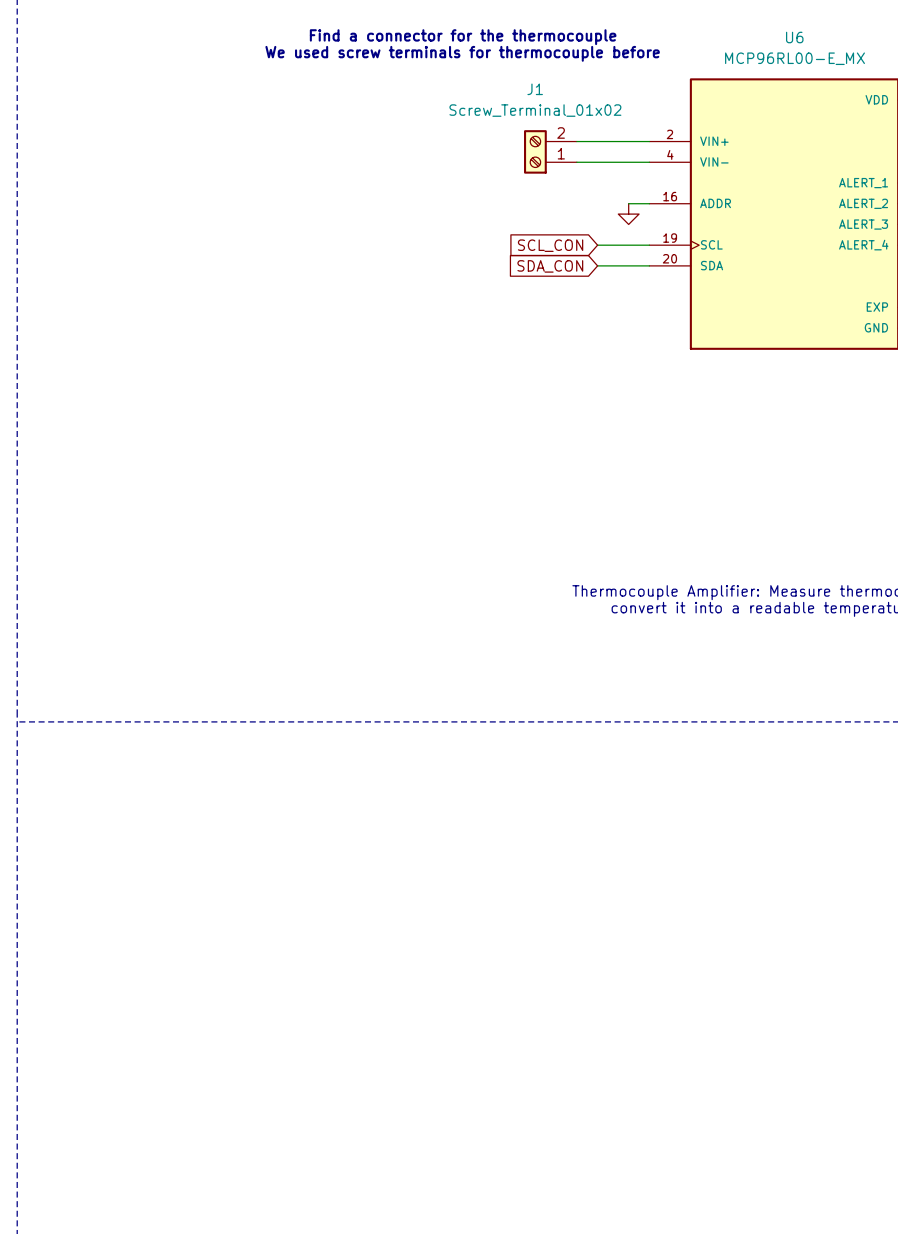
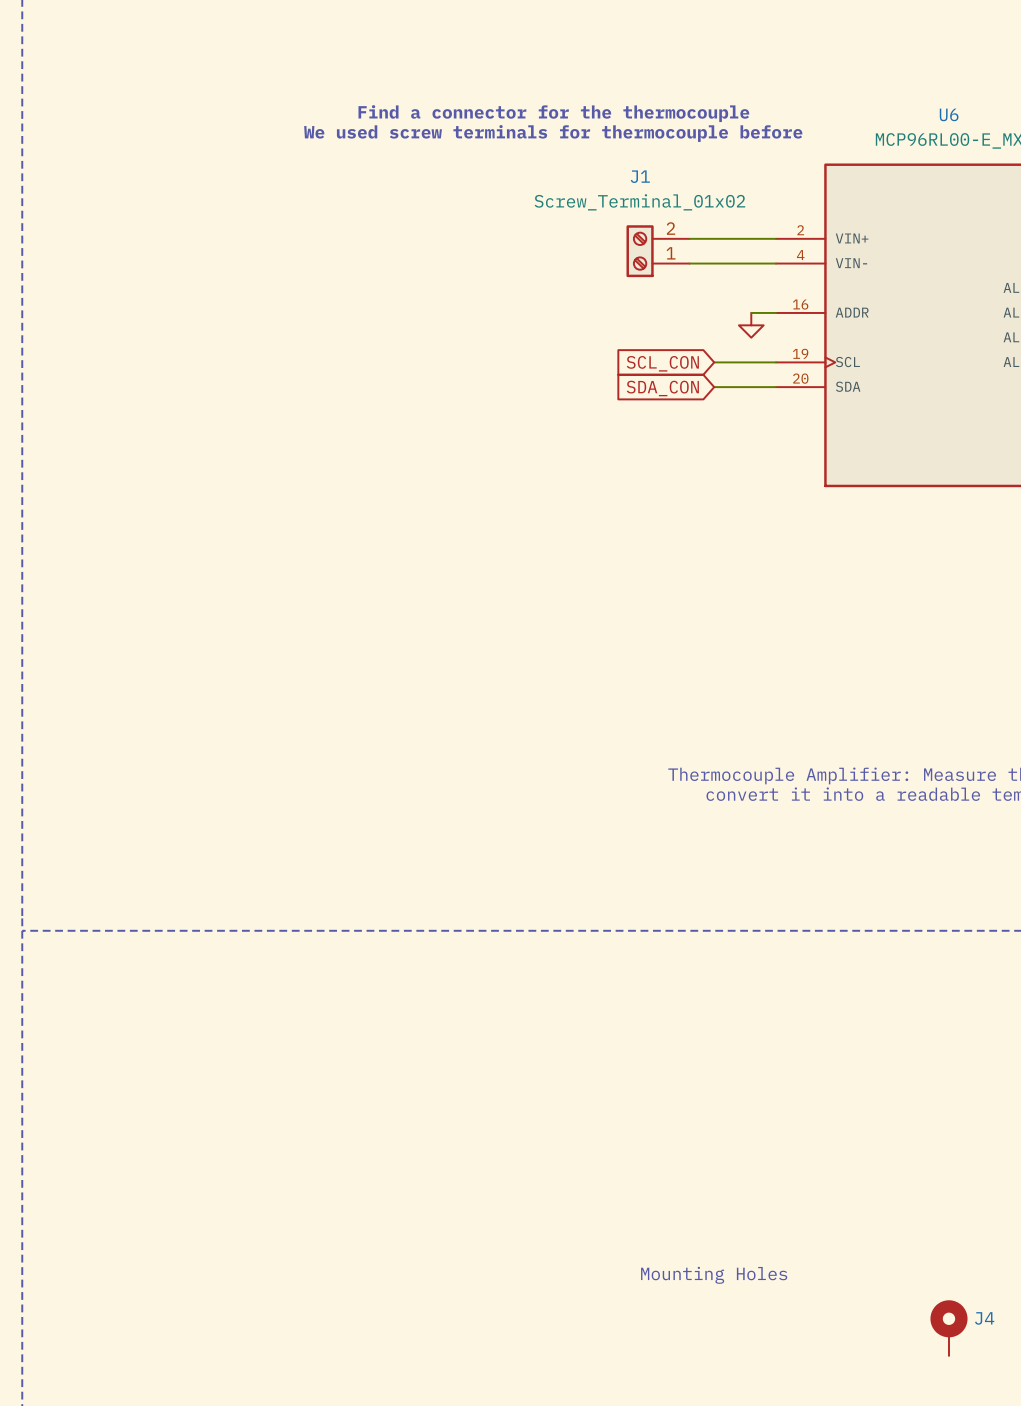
text: none -> Mounting Holes (714, 1275)
J4: none -> (948, 1328)

